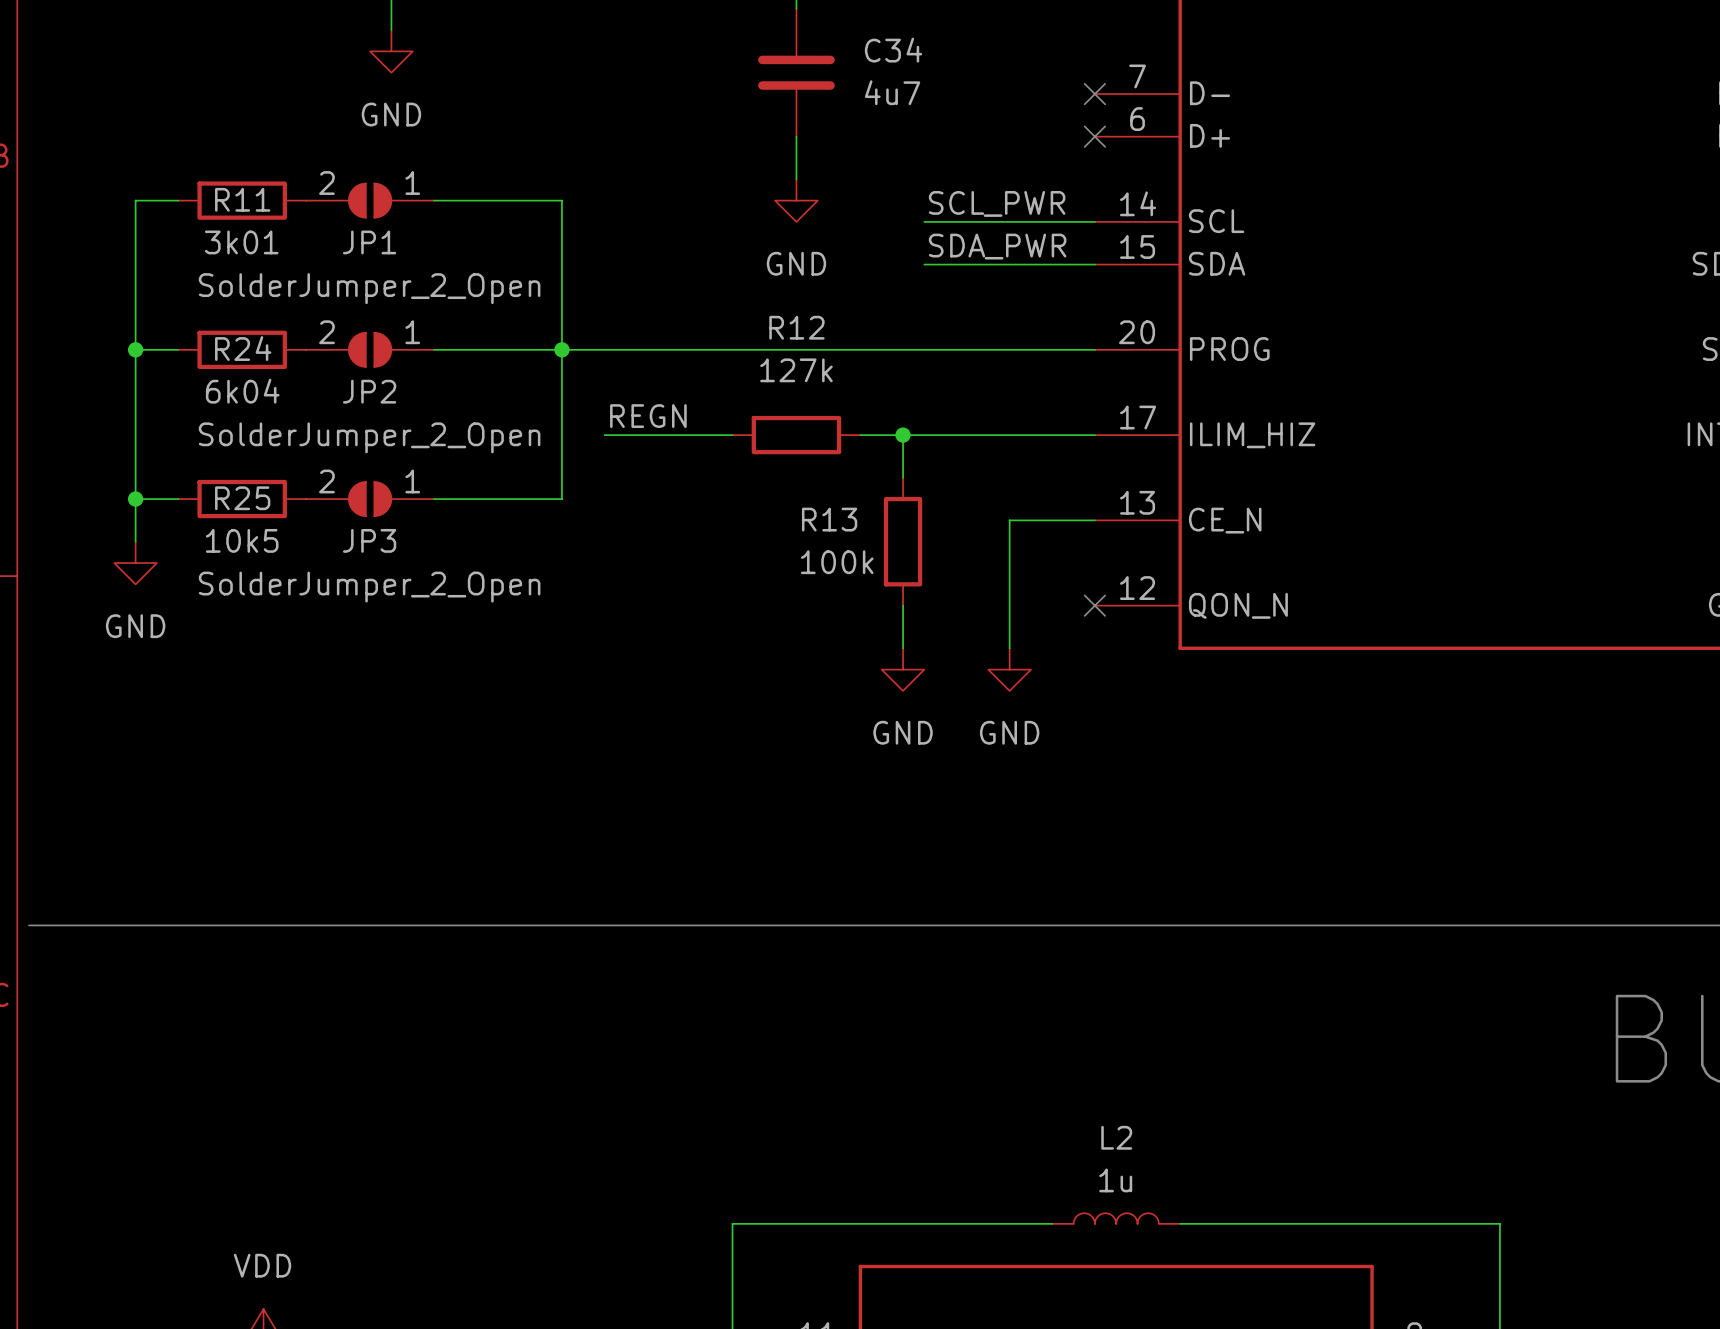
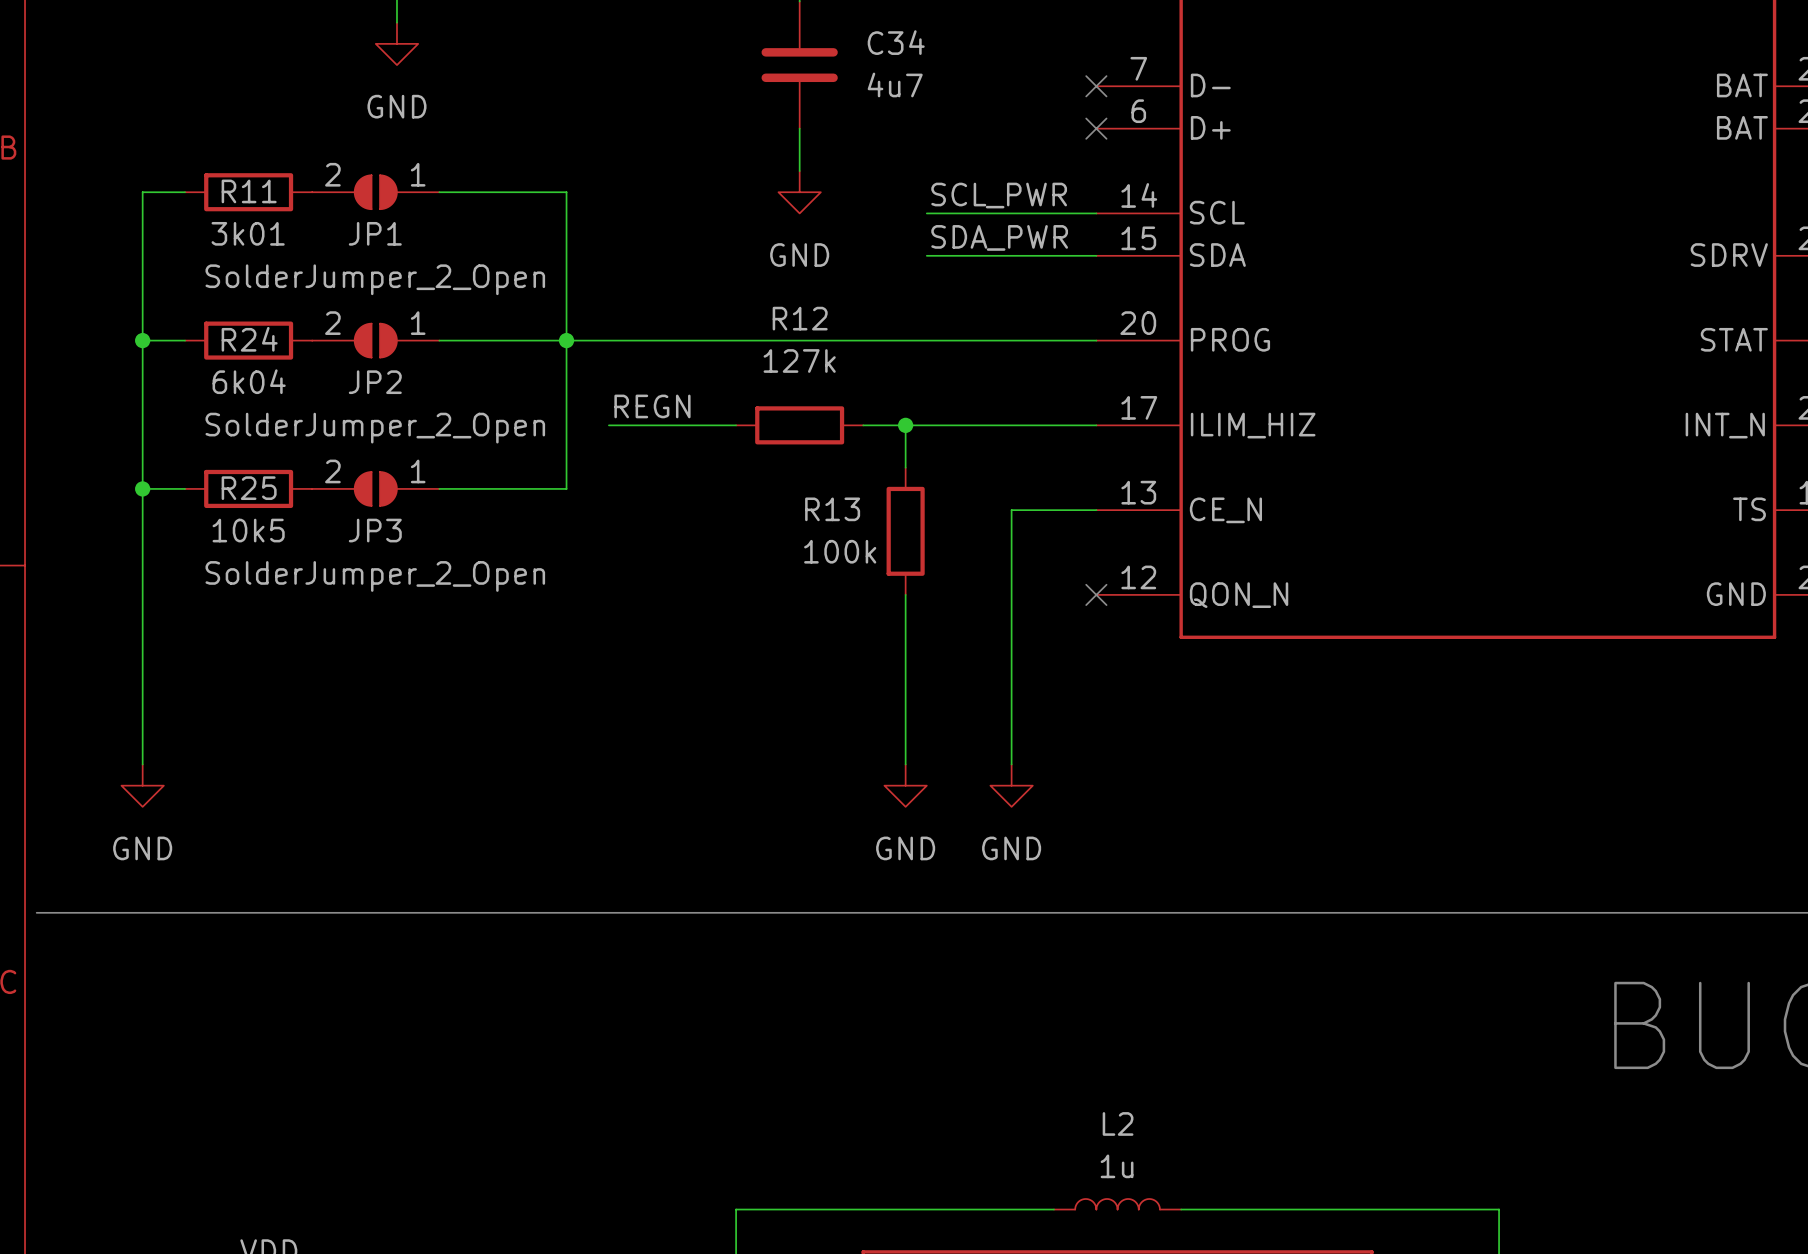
wire: none -> (142, 531) (142, 764)
power symbol position: GND (135, 563) -> GND (142, 785)
wire: none -> (905, 637) (905, 764)
wire: none -> (1011, 637) (1011, 764)
power symbol: GND (903, 669) -> none
power symbol: GND (1009, 669) -> none
power symbol: none -> GND (905, 785)
power symbol: none -> GND (1011, 785)

